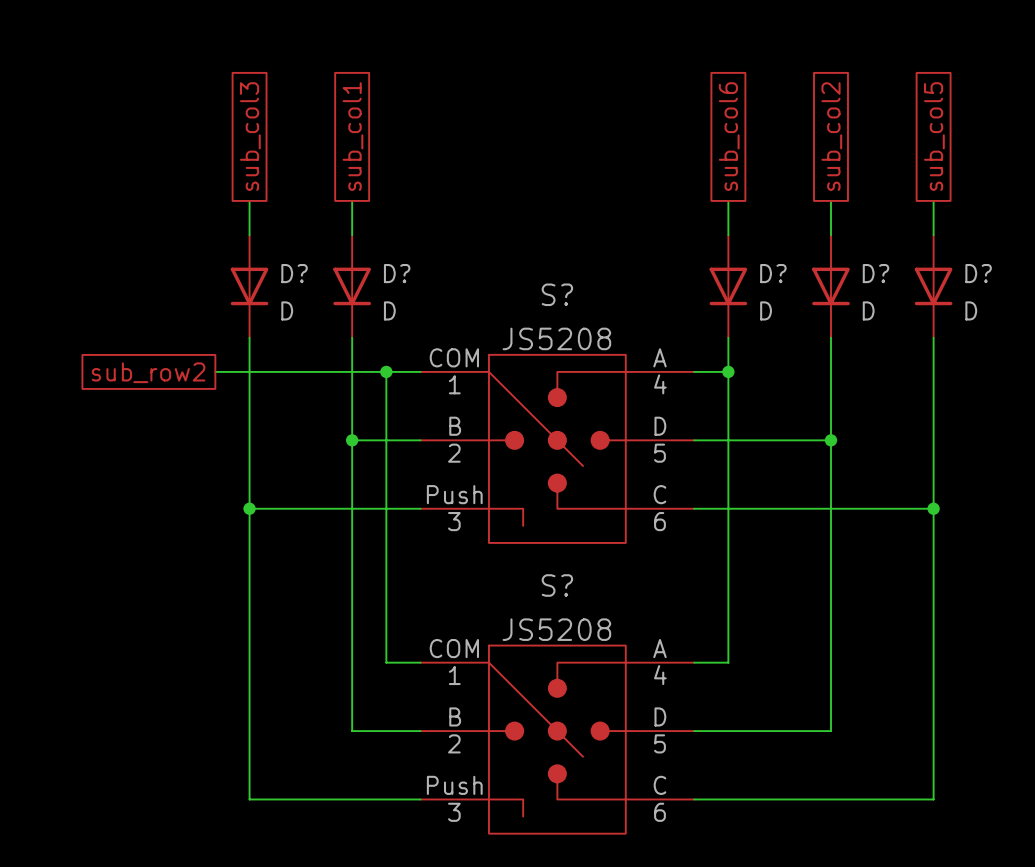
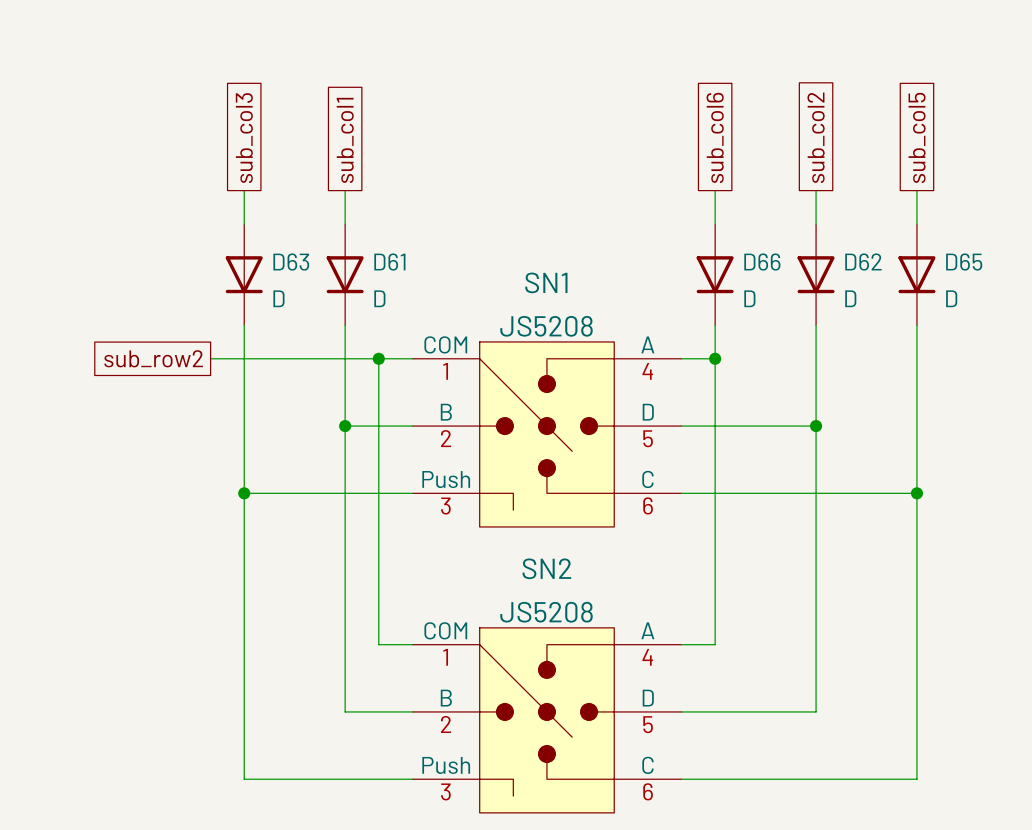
D? name: D? (294, 273) -> D63 (291, 262)
D? name: D? (397, 273) -> D61 (389, 262)
D? name: D? (773, 273) -> D66 (762, 262)
D? name: D? (875, 273) -> D62 (863, 262)
D? name: D? (978, 273) -> D65 (964, 262)
S? name: S? (557, 294) -> SN1 (546, 282)
S? name: S? (557, 585) -> SN2 (546, 568)

